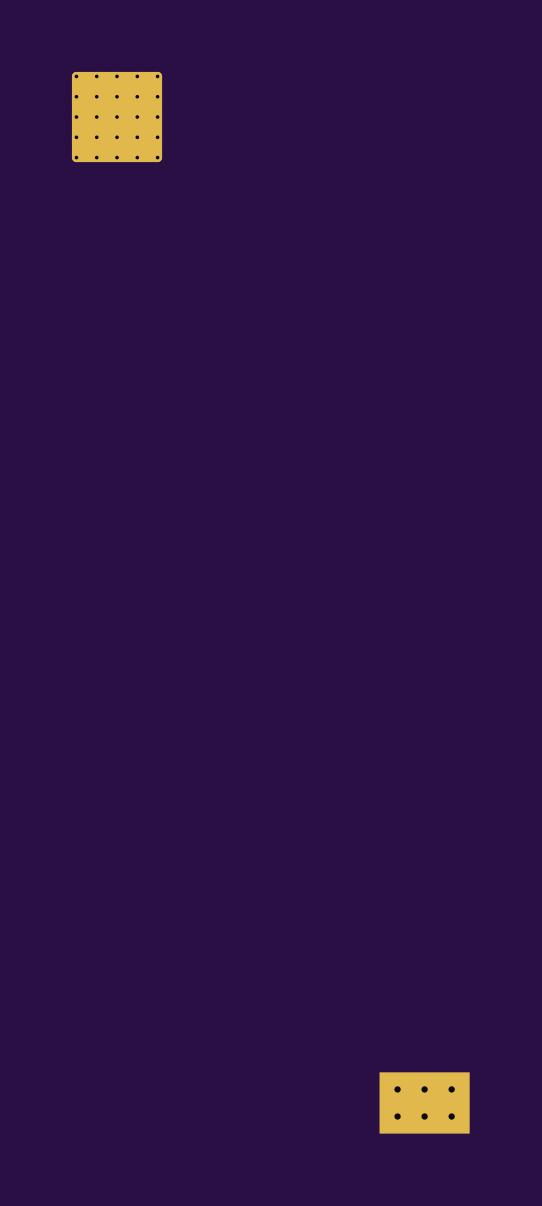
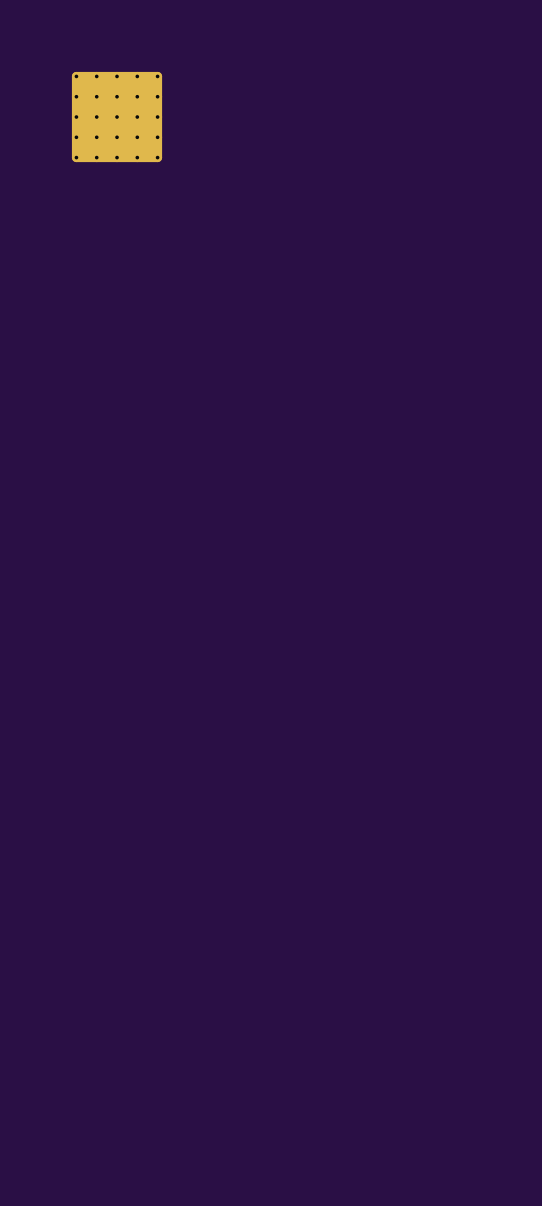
part: (424, 1102) -> none

